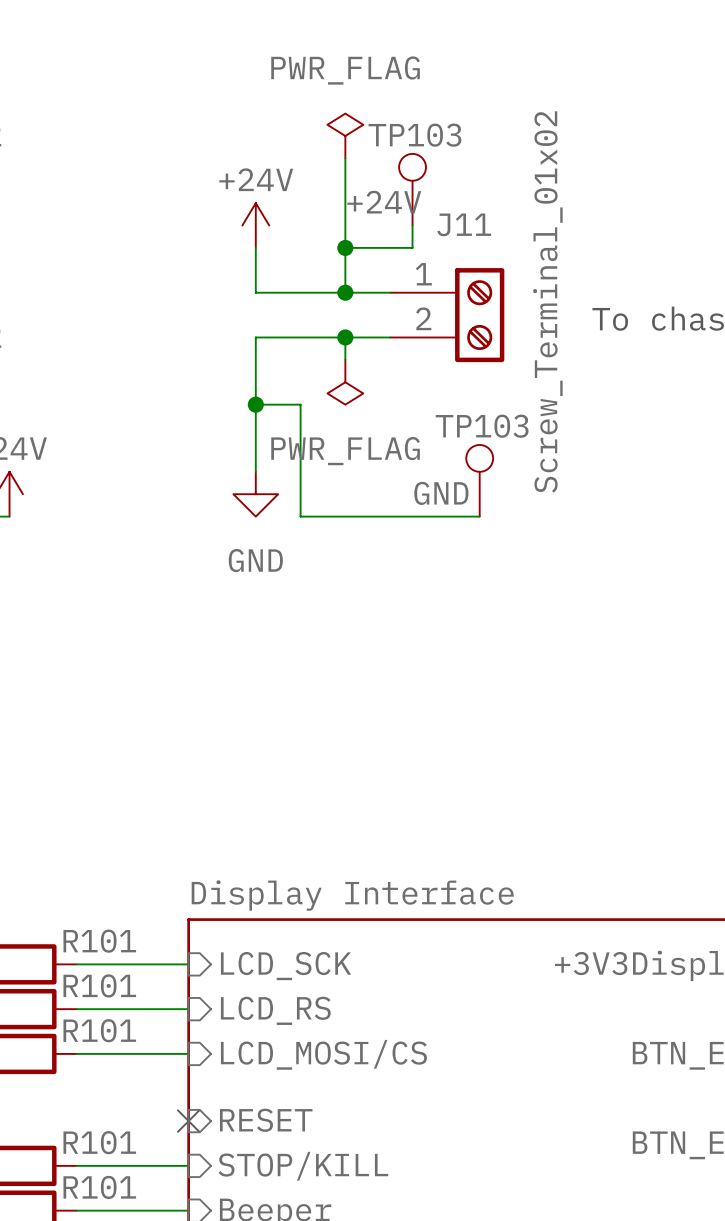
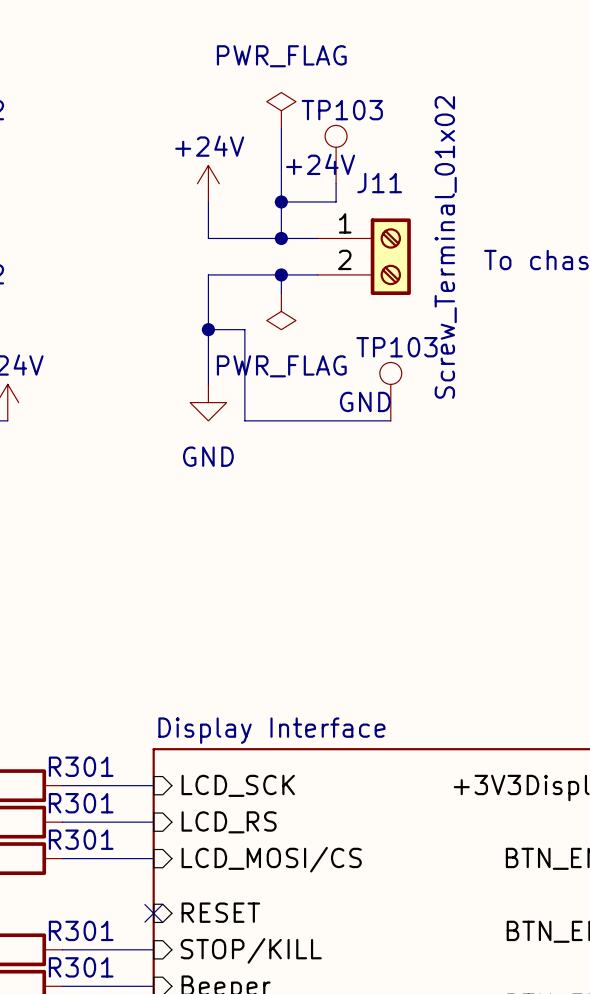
R101 name: R101 (99, 941) -> R301 (81, 766)
R101 name: R101 (99, 985) -> R301 (81, 803)
R101 name: R101 (99, 1030) -> R301 (81, 839)
R101 name: R101 (99, 1142) -> R301 (81, 930)
R101 name: R101 (99, 1187) -> R301 (81, 967)

